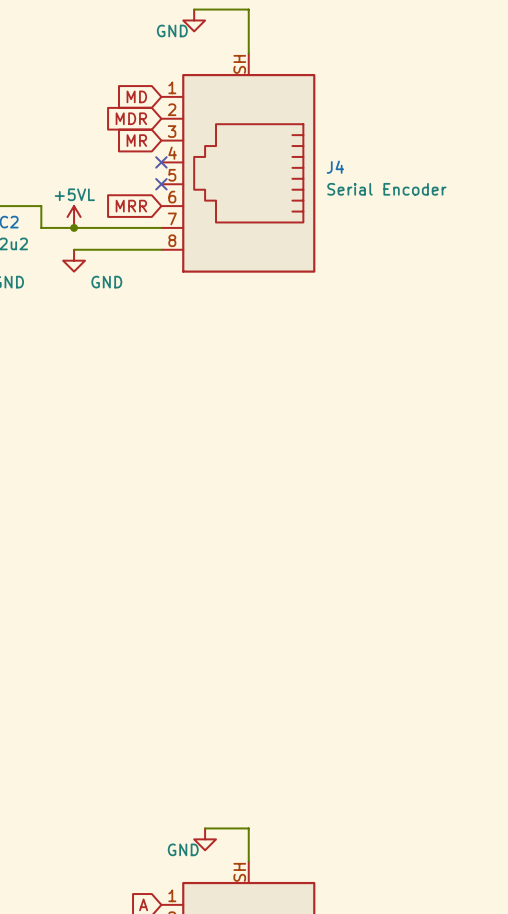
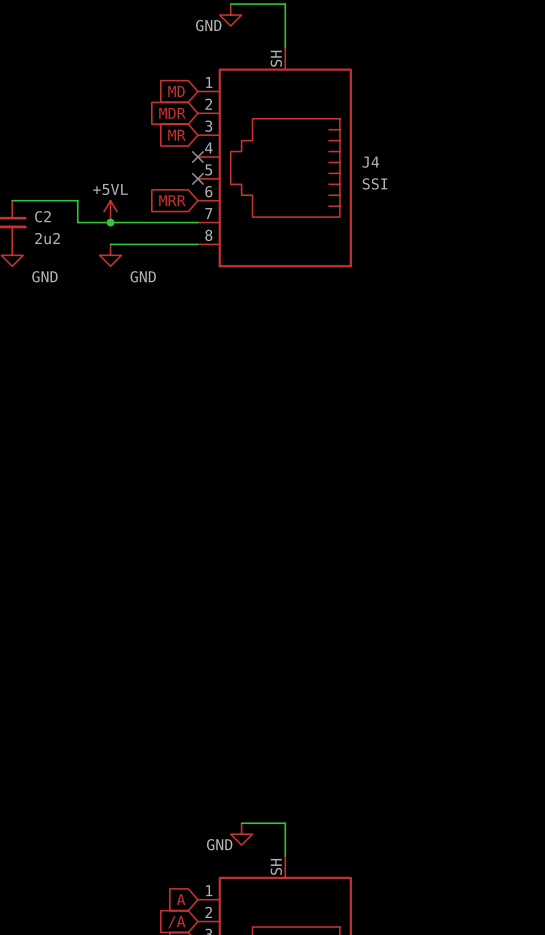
J4 value: Serial Encoder (386, 189) -> SSI (375, 183)

